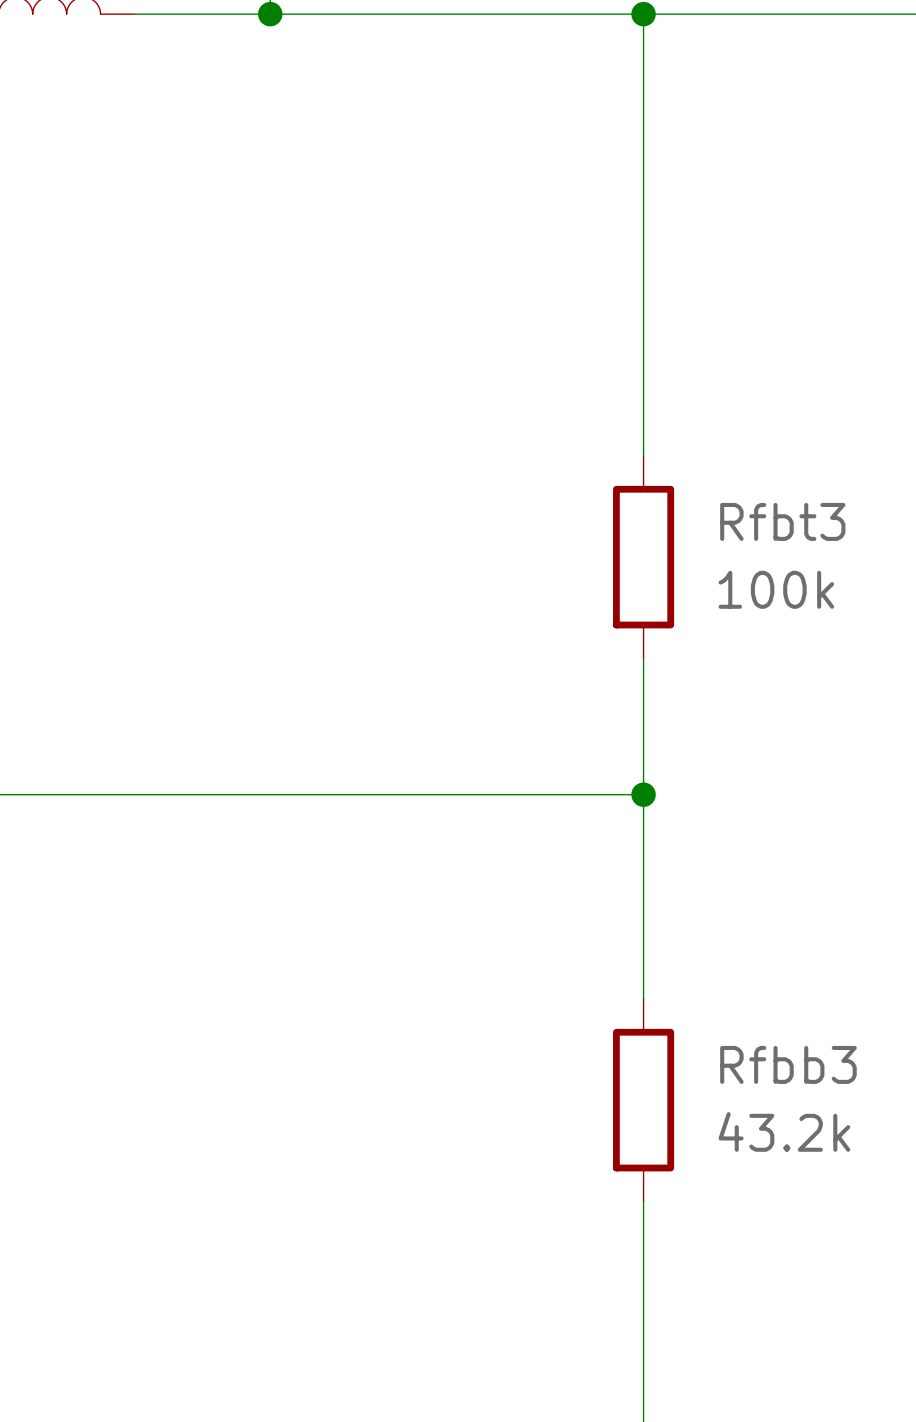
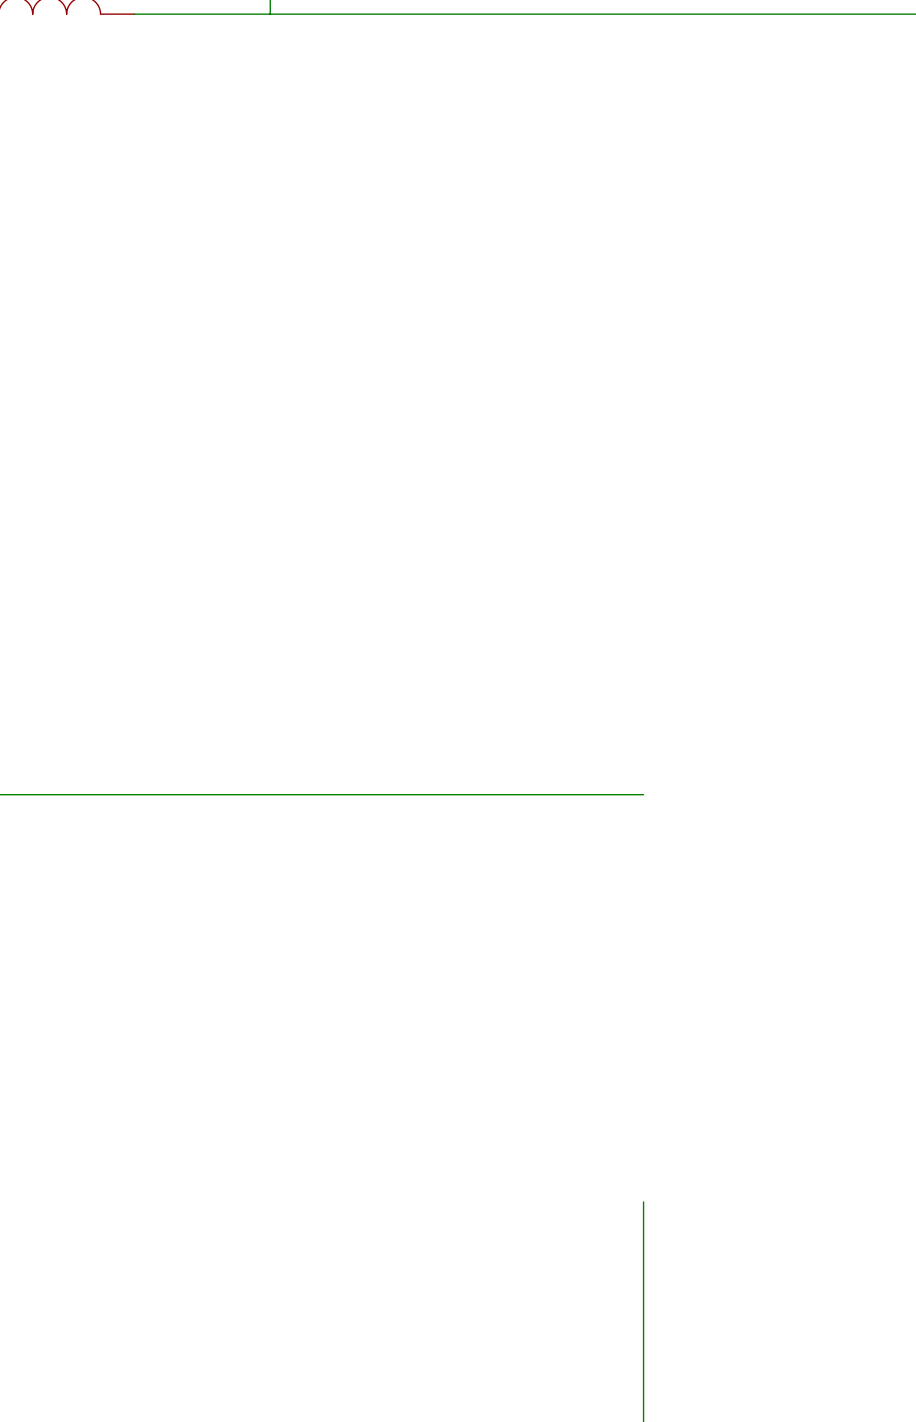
junction: (270, 14) -> none
wire: (643, 14) (643, 455) -> none
junction: (643, 14) -> none
Rfbt3: 100k (643, 557) -> none
wire: (643, 658) (643, 998) -> none
junction: (643, 794) -> none
Rfbb3: 43.2k (643, 1100) -> none

